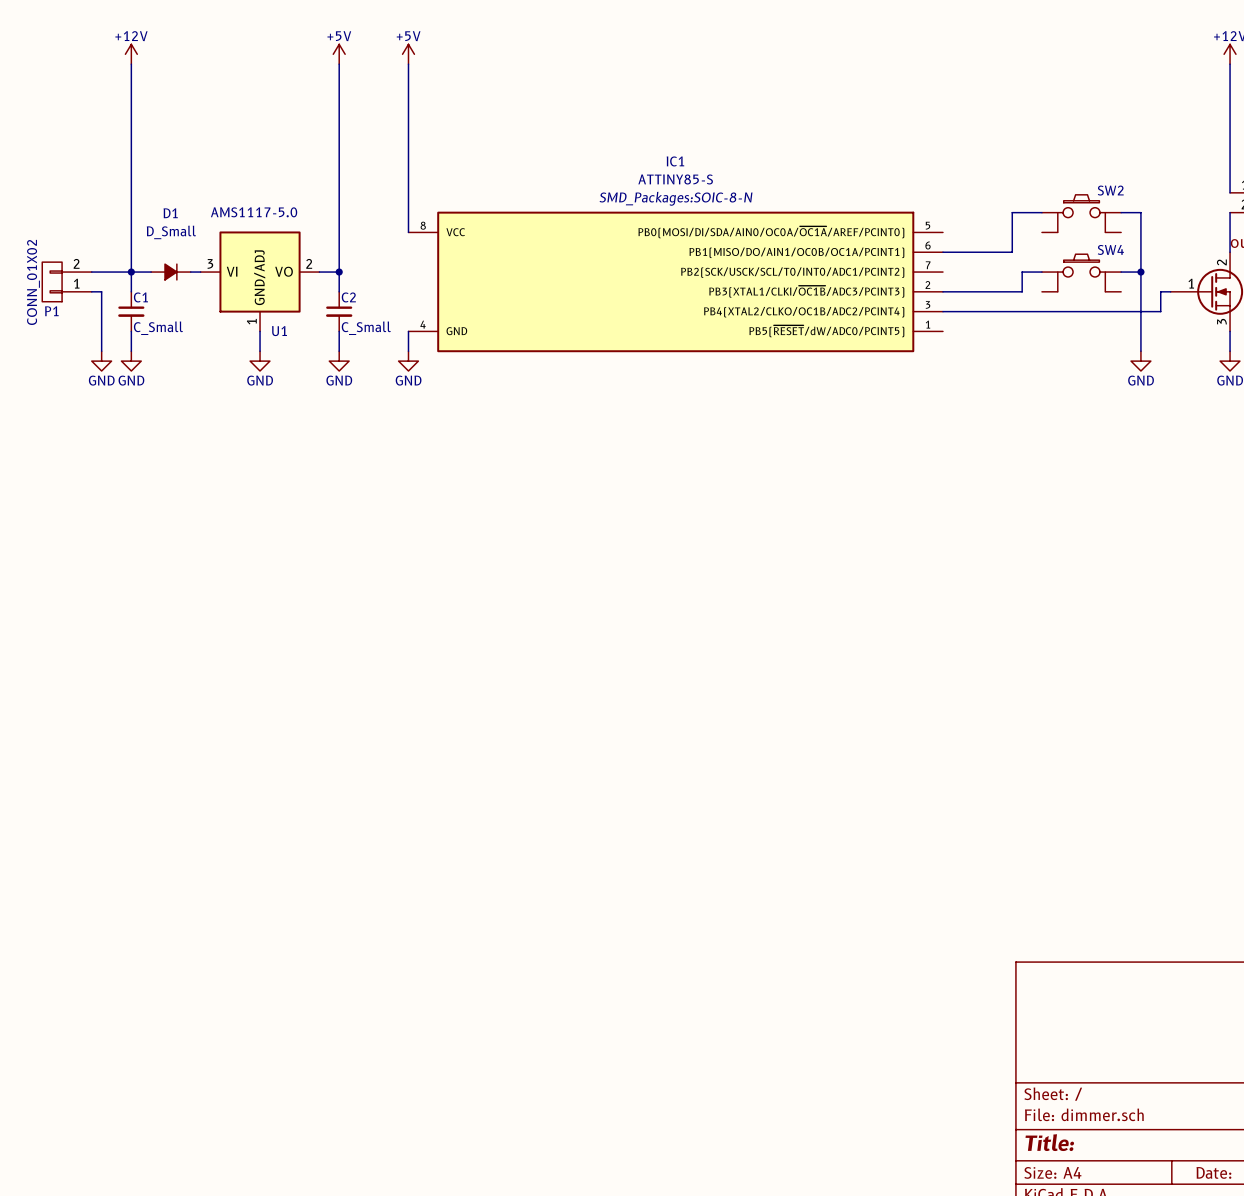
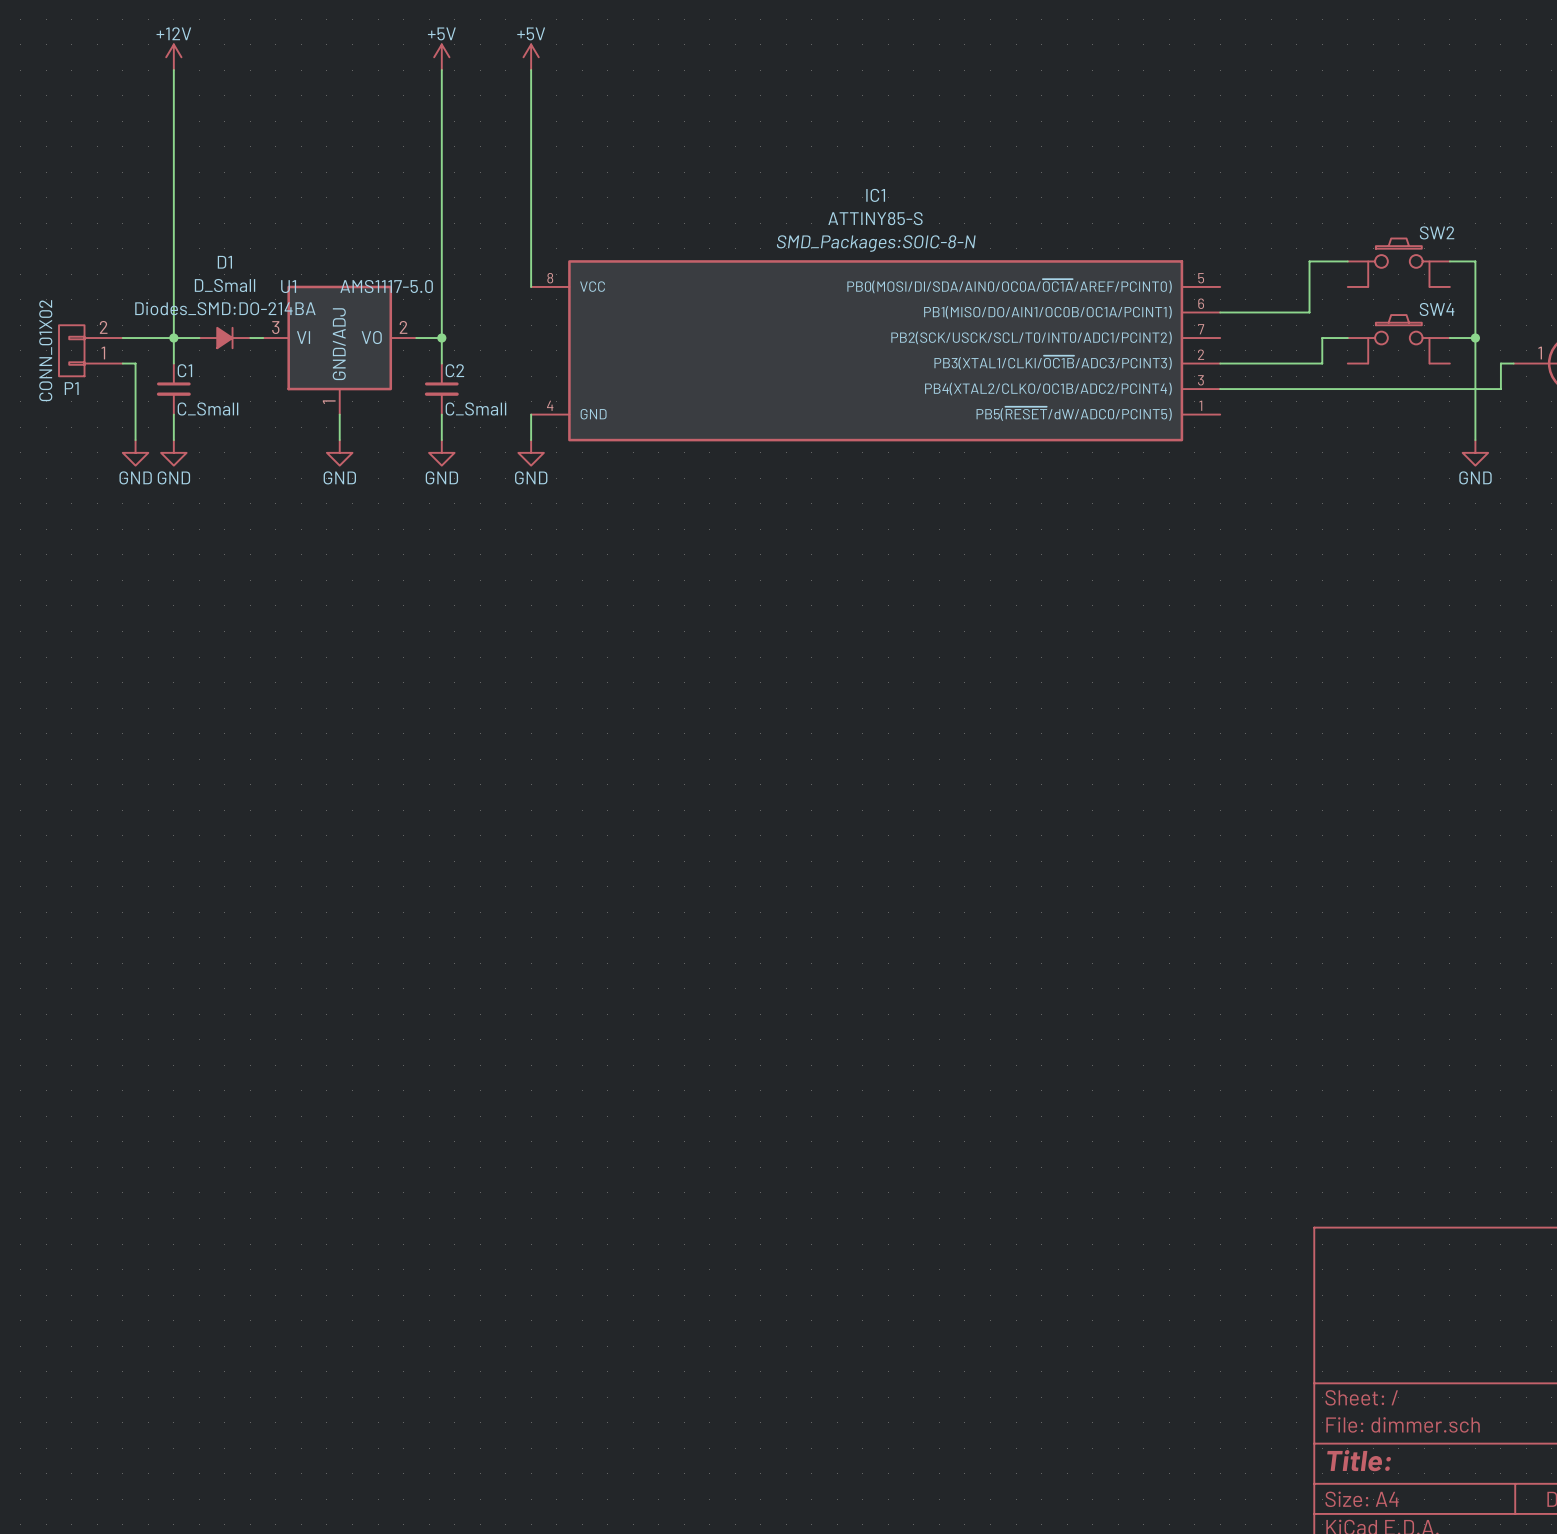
U1 value position: AMS1117-5.0 (254, 212) -> AMS1117-5.0 (386, 286)
D1 text: none -> Diodes_SMD:DO-214BA (225, 308)
U1 name position: U1 (279, 331) -> U1 (288, 286)

